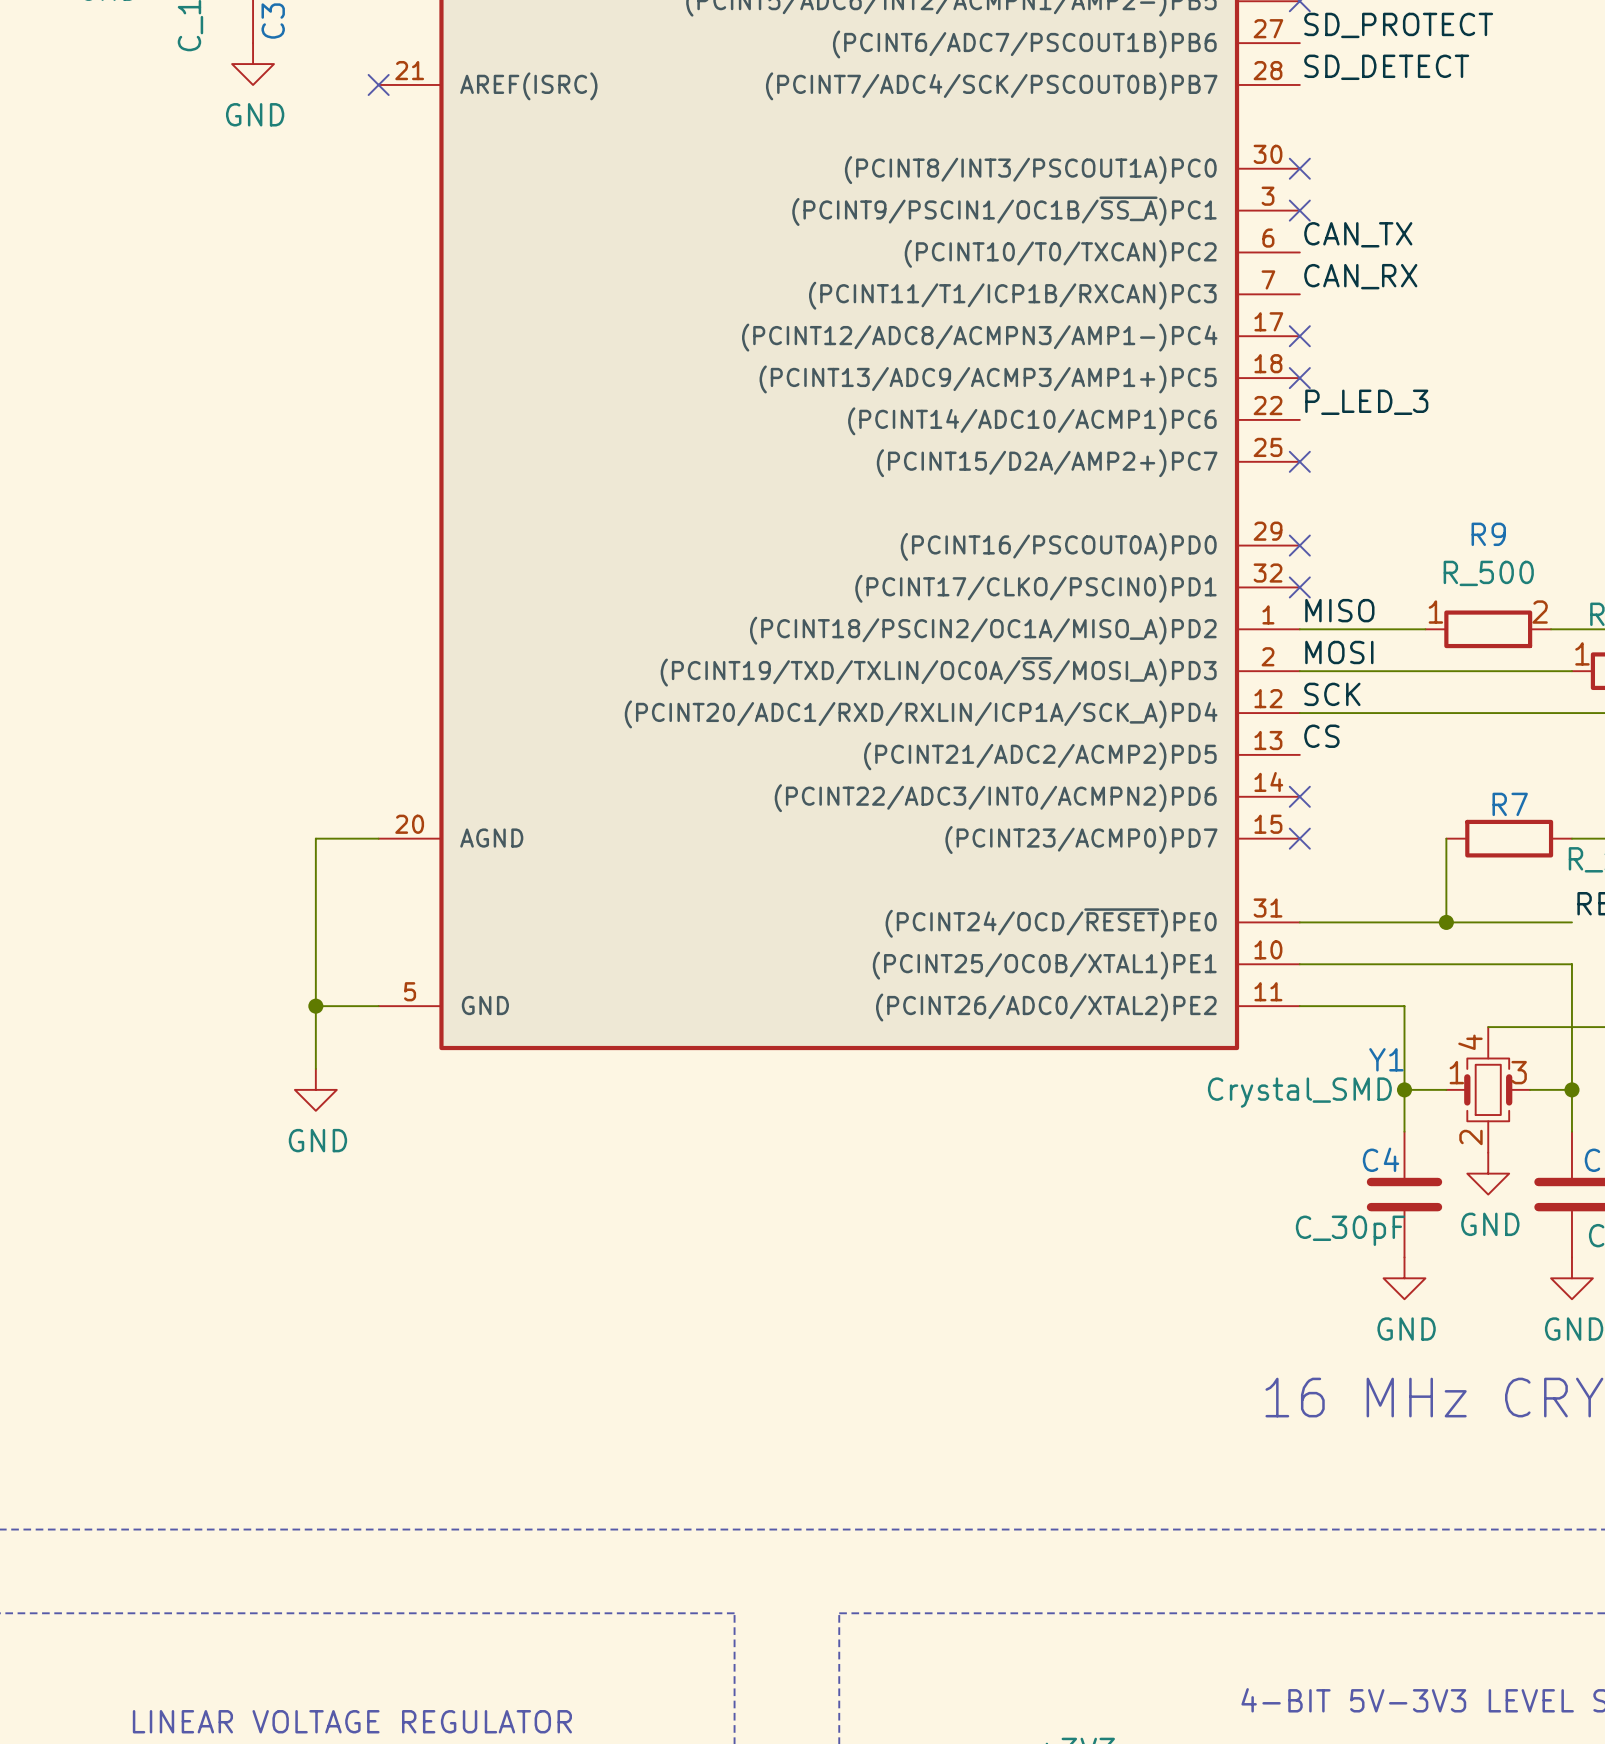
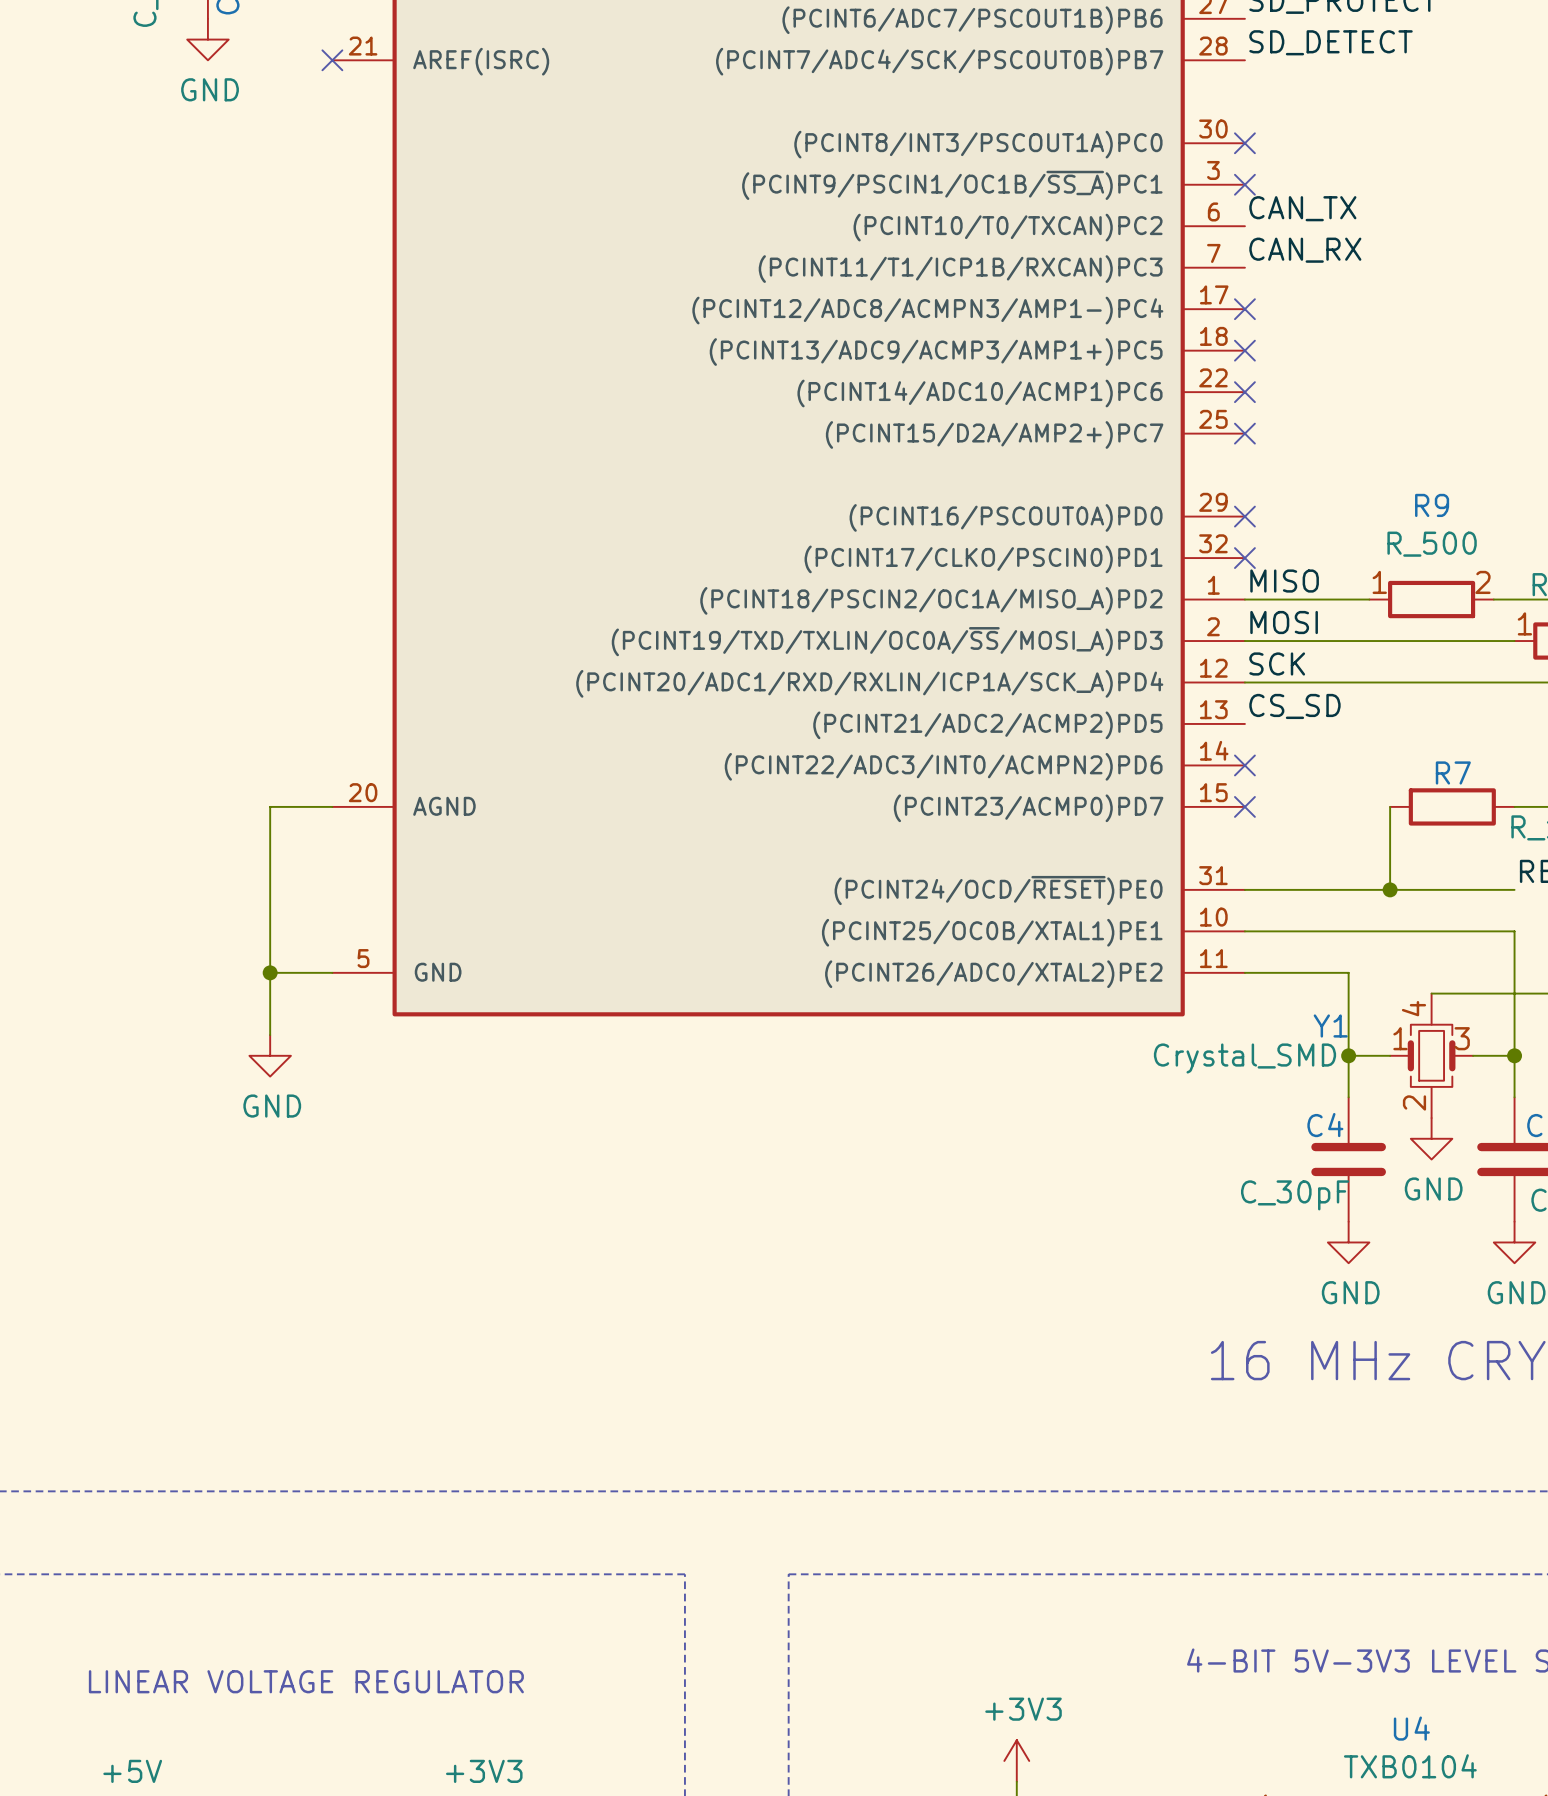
label: P_LED_3 (1366, 402) -> none
no-connect mark: none -> (1244, 392)
label: CS (1321, 736) -> CS_SD (1294, 706)

